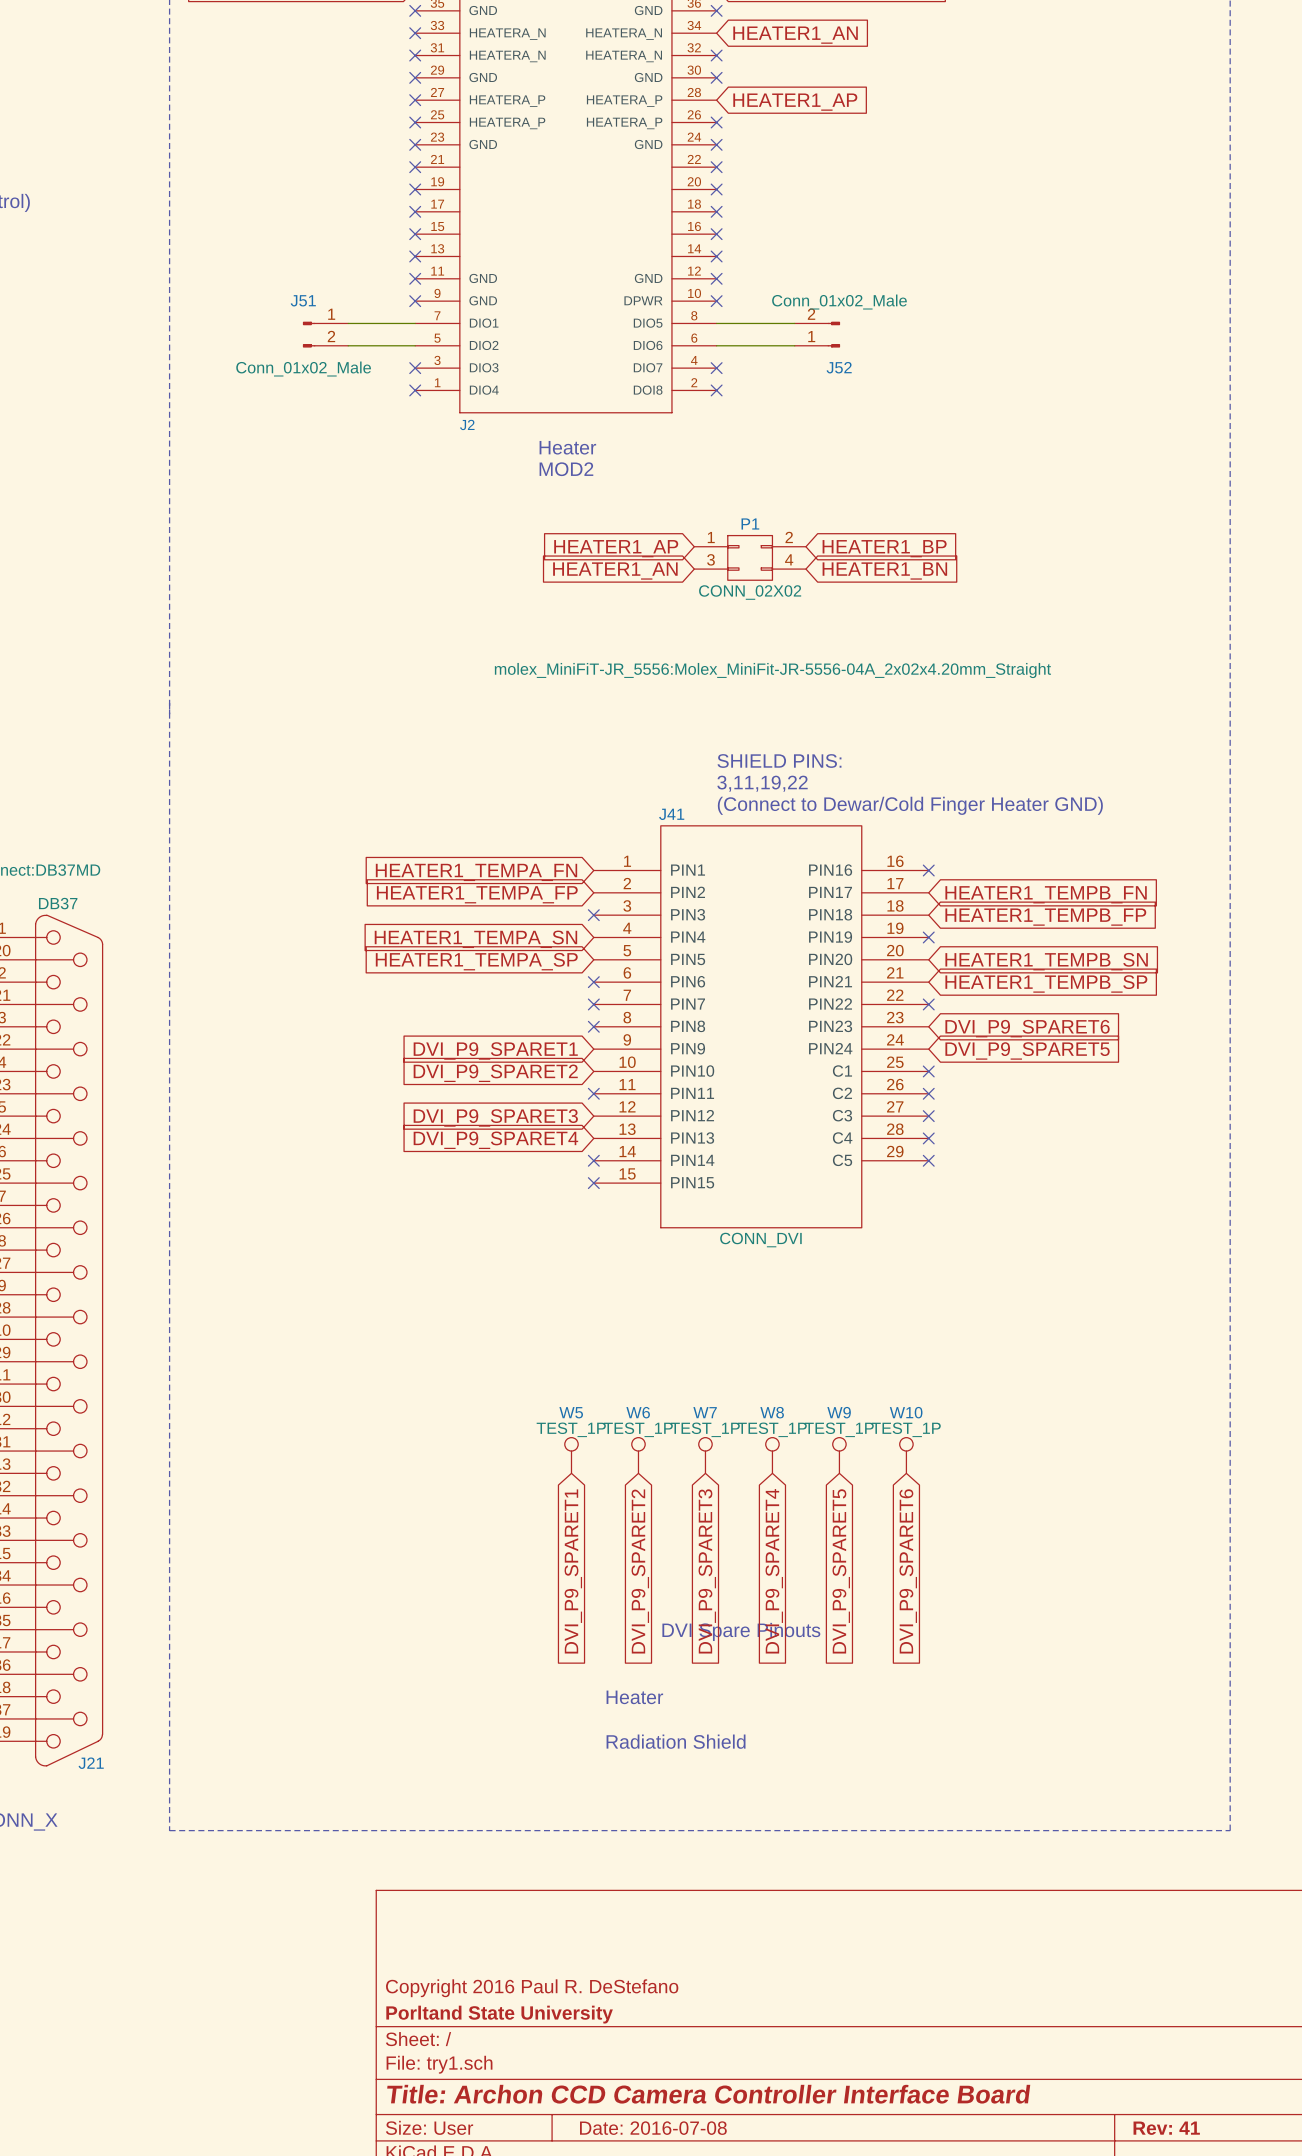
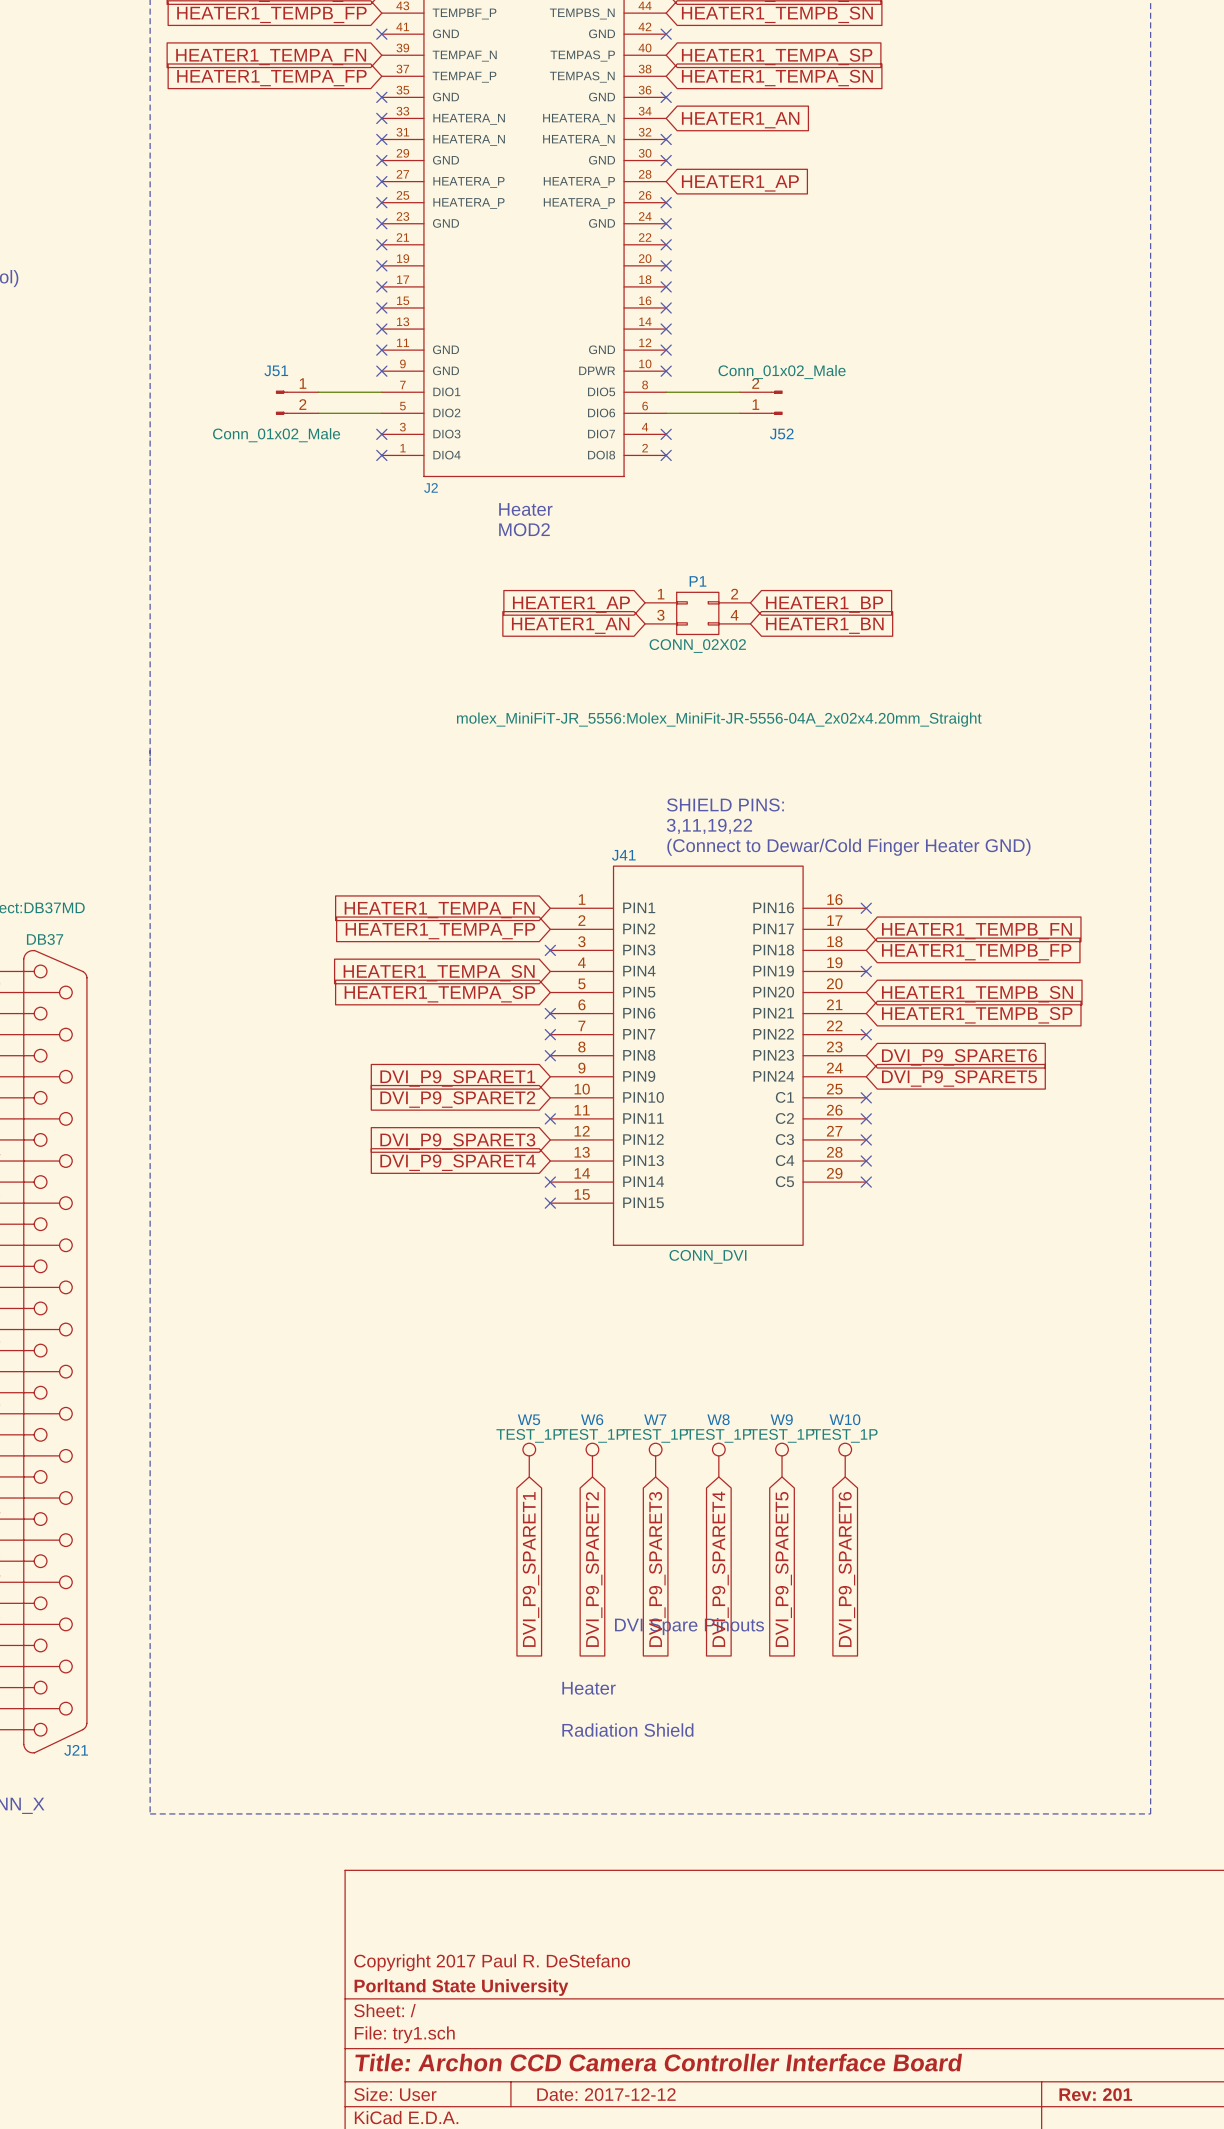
title block: Copyright 2016 Paul R. DeStefano (532, 1988) -> Copyright 2017 Paul R. DeStefano (492, 1962)
title block: Date: 2016-07-08 (653, 2128) -> Date: 2017-12-12 (606, 2094)
title block: Rev: 41 (1166, 2128) -> Rev: 201 (1095, 2094)

